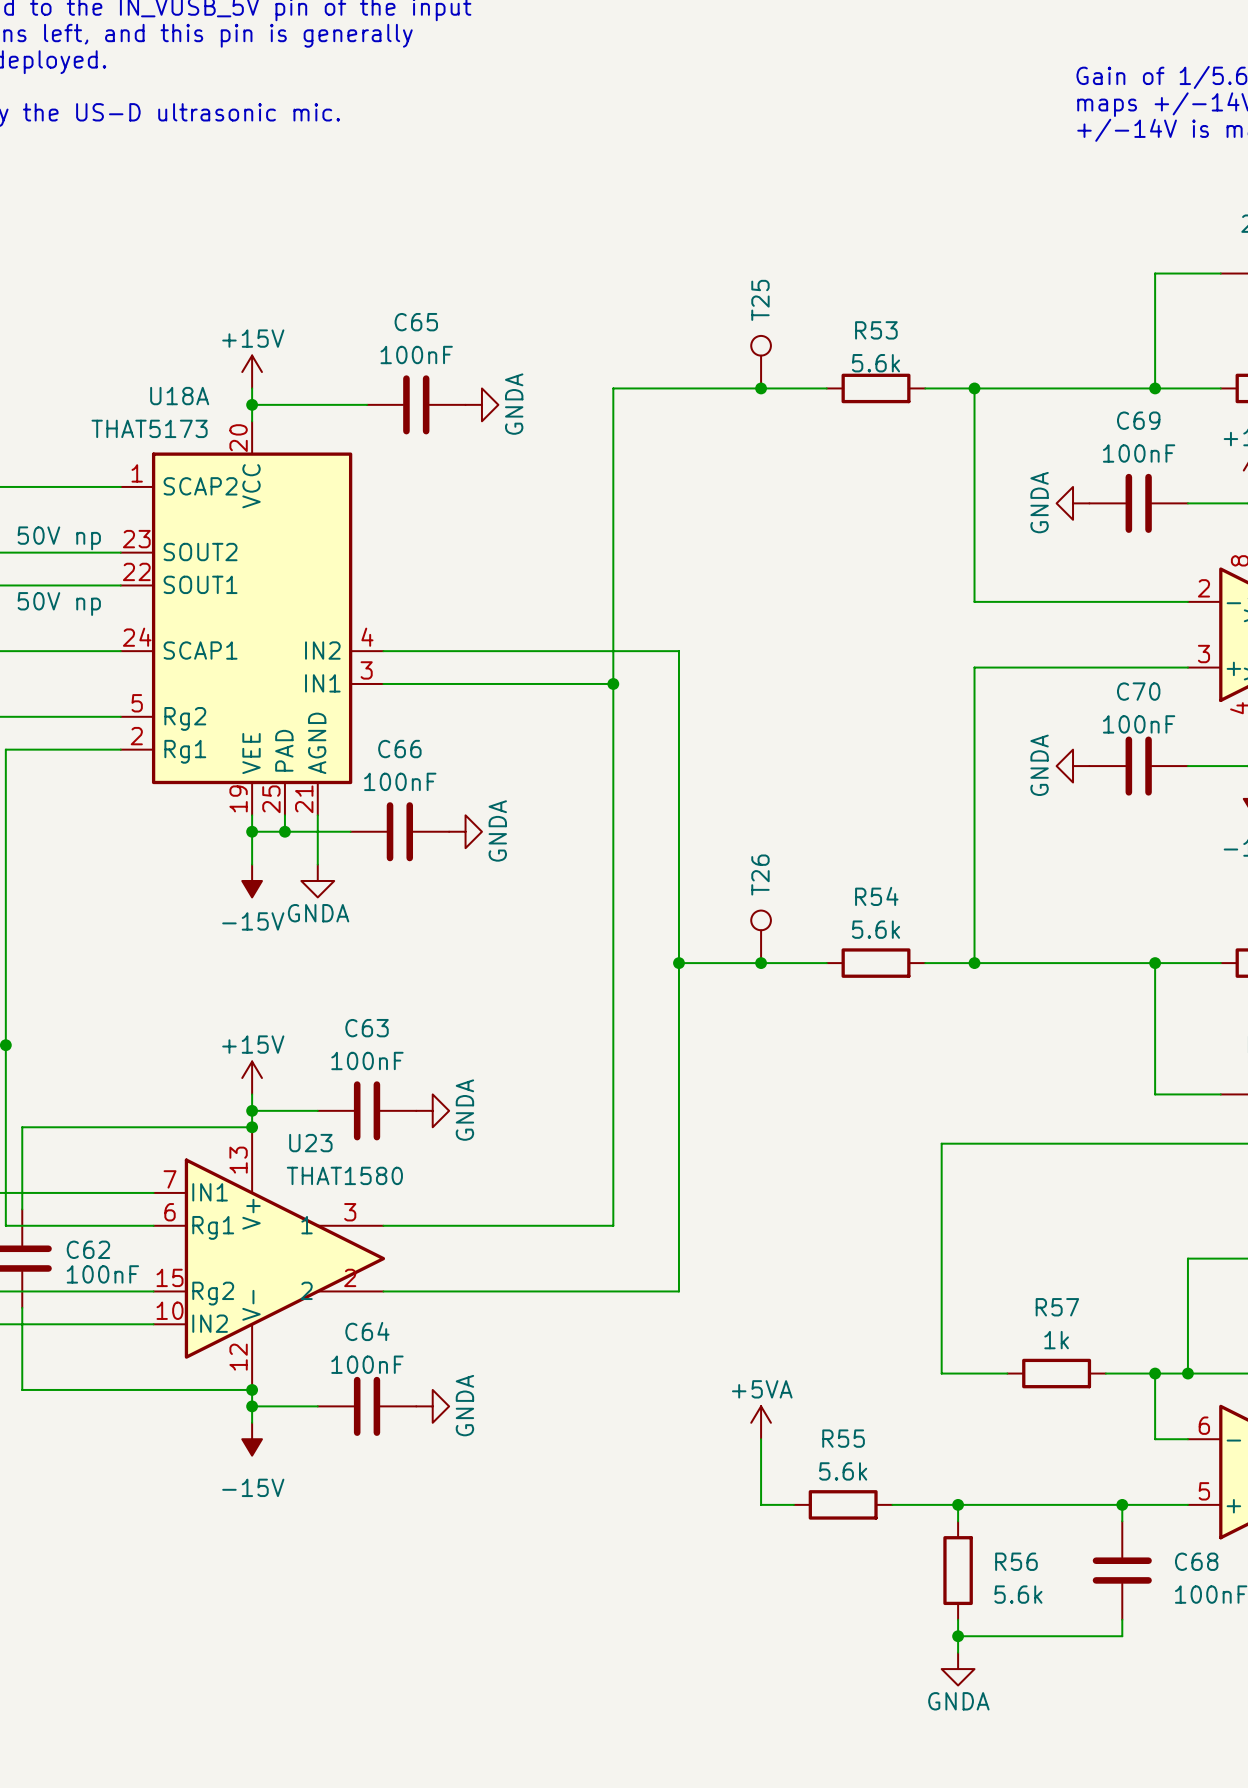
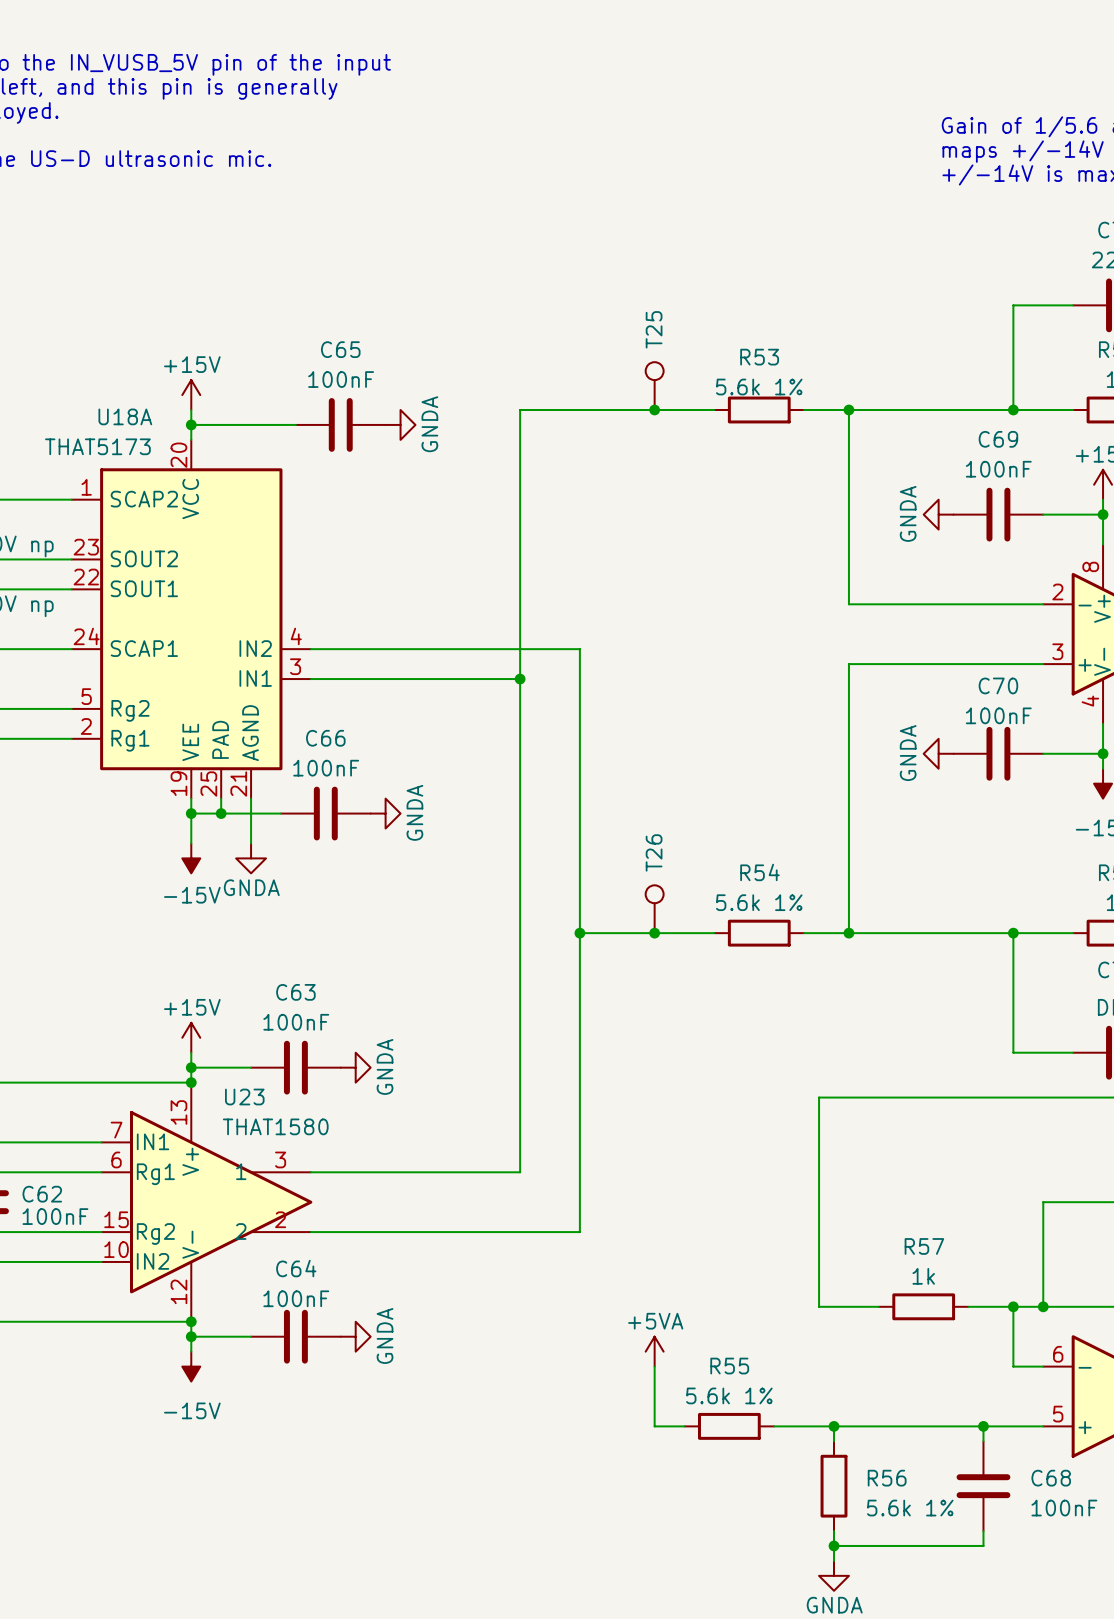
R53 value: 5.6k (876, 363) -> 5.6k 1% (759, 387)
R54 value: 5.6k (876, 929) -> 5.6k 1% (759, 902)
R55 value: 5.6k (843, 1471) -> 5.6k 1% (729, 1395)
R56 value: 5.6k (1018, 1594) -> 5.6k 1% (910, 1508)

